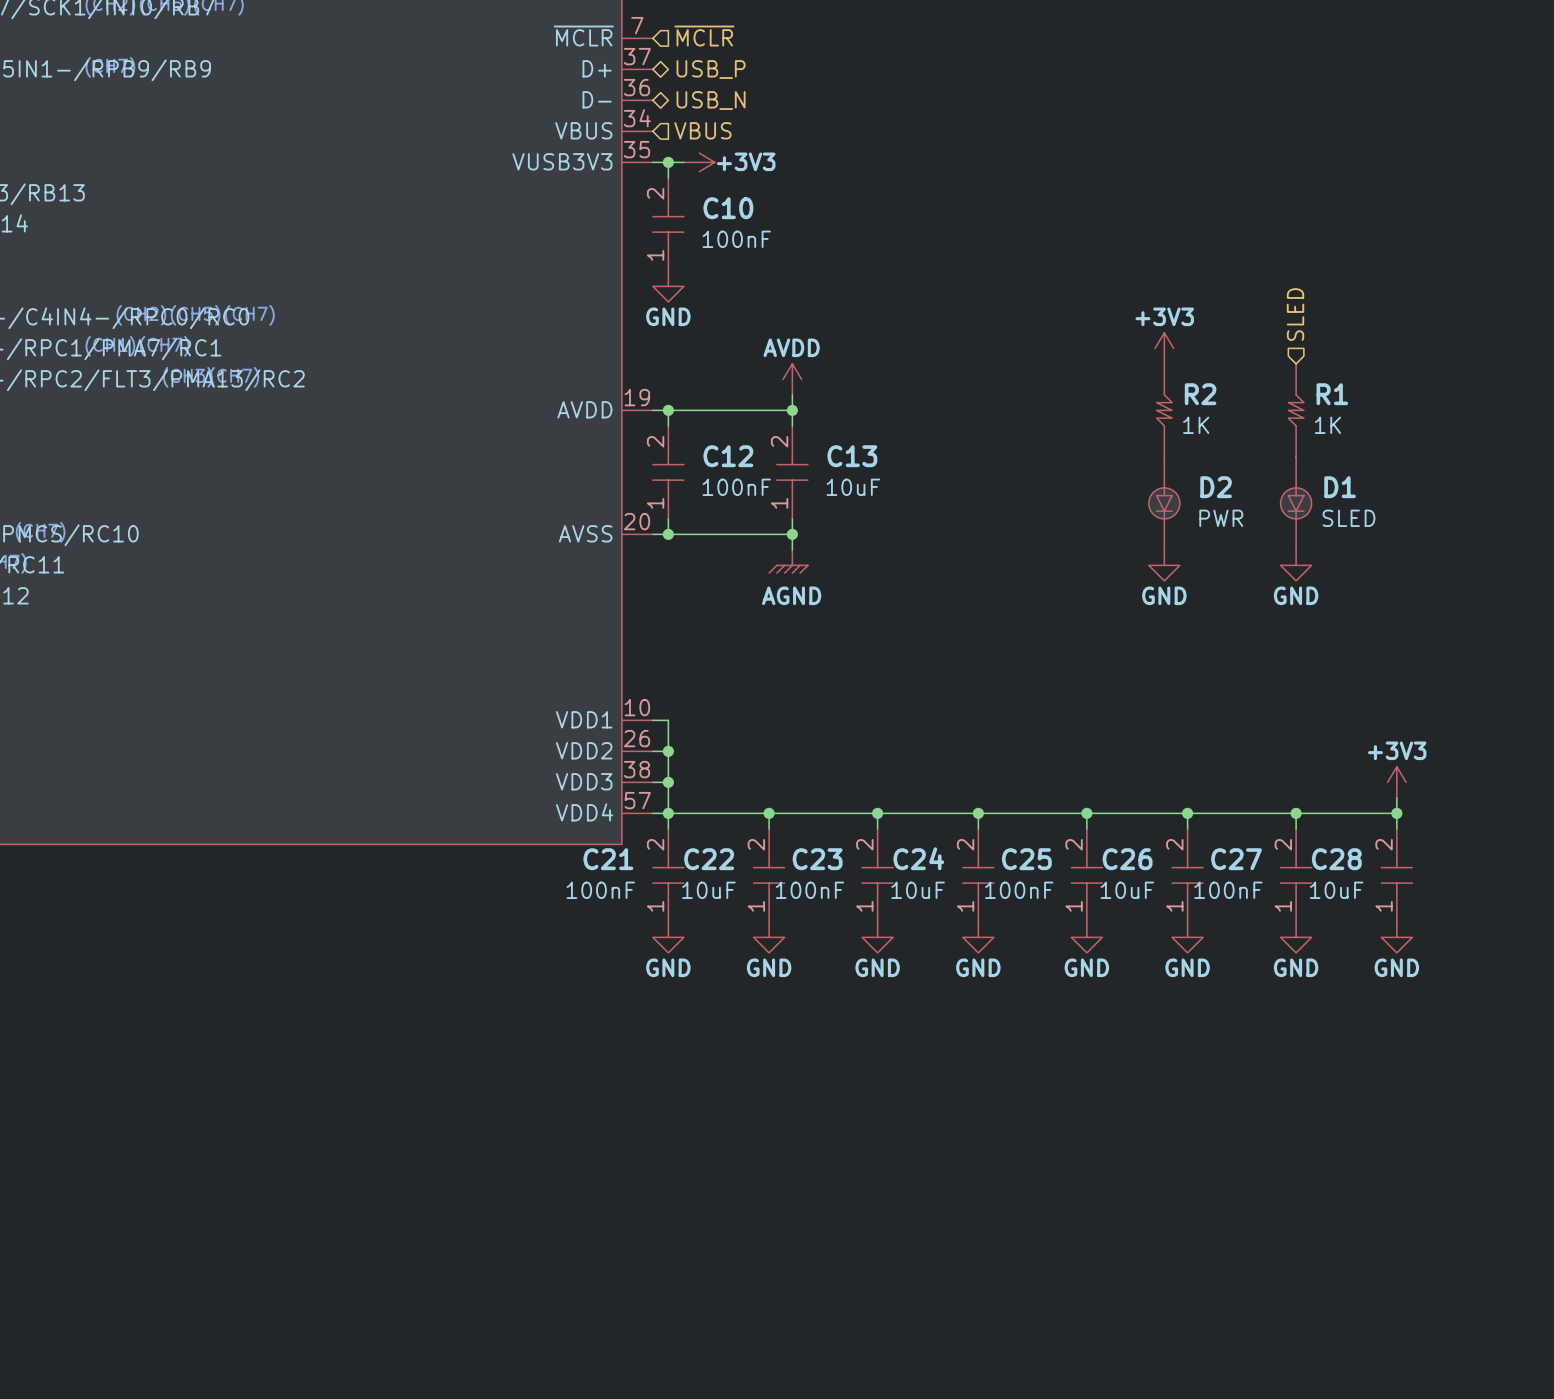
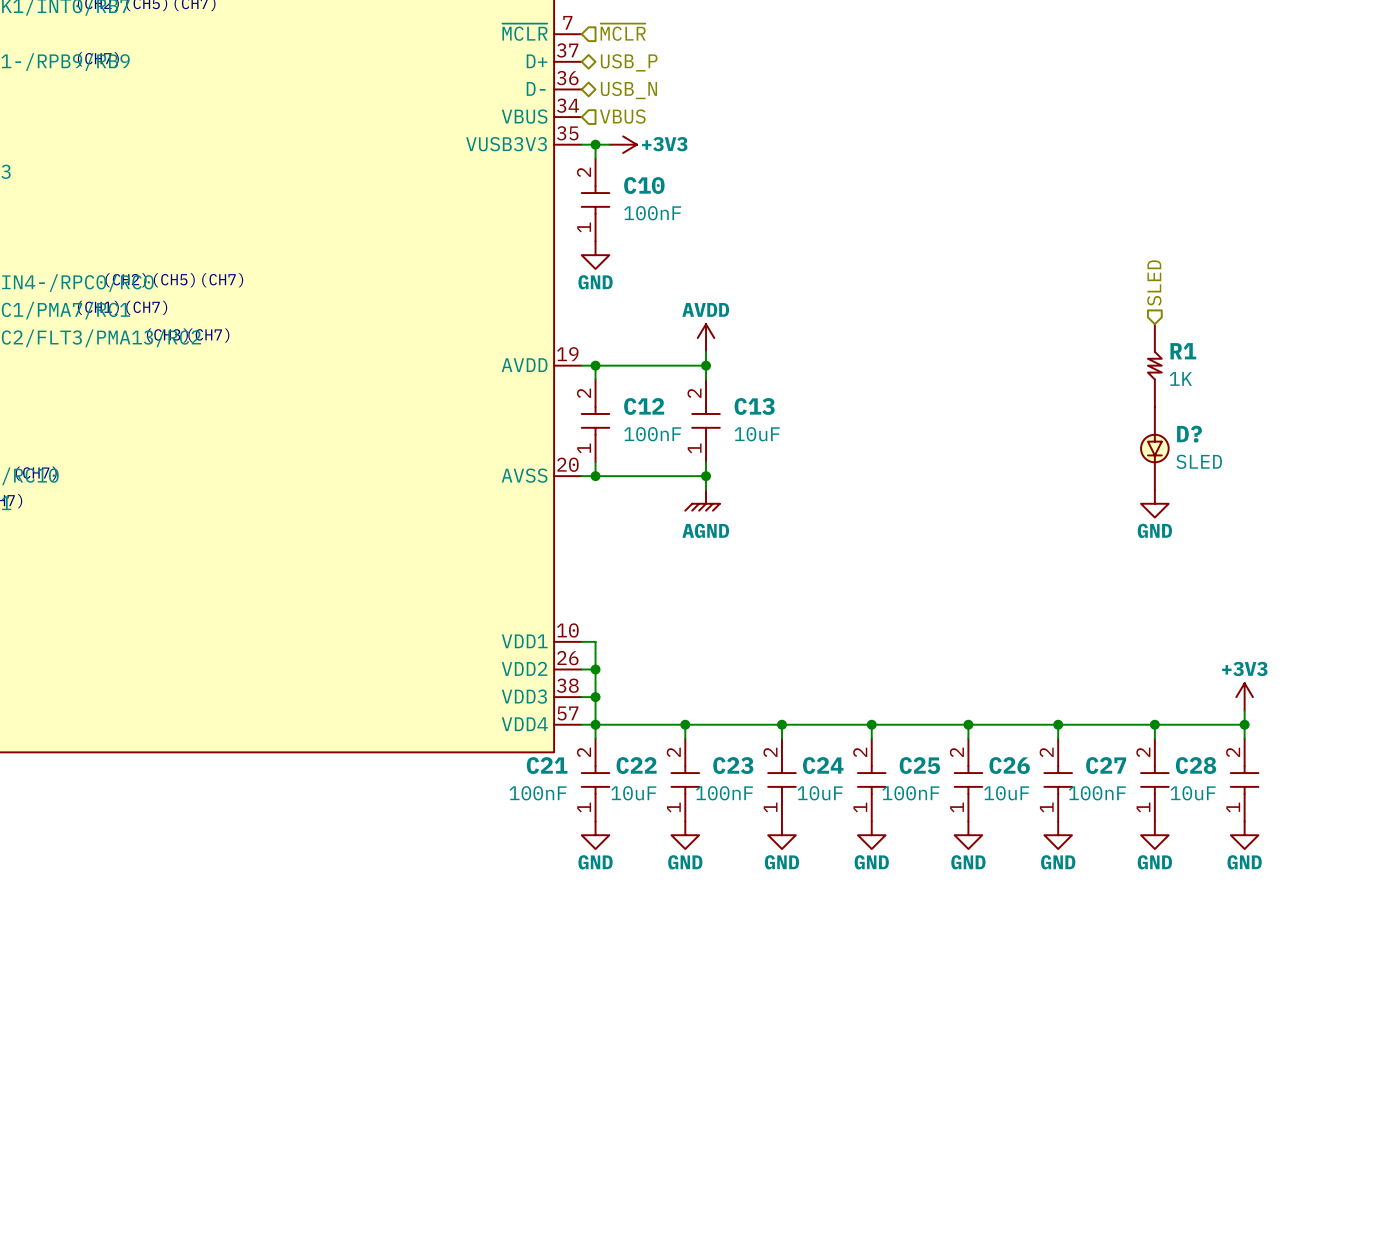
power symbol: +3V3 (1164, 348) -> none
R2: 1K (1164, 410) -> none
D1 name: D1 (1340, 487) -> D? (1189, 434)
D2: PWR (1164, 503) -> none
power symbol: GND (1164, 565) -> none

